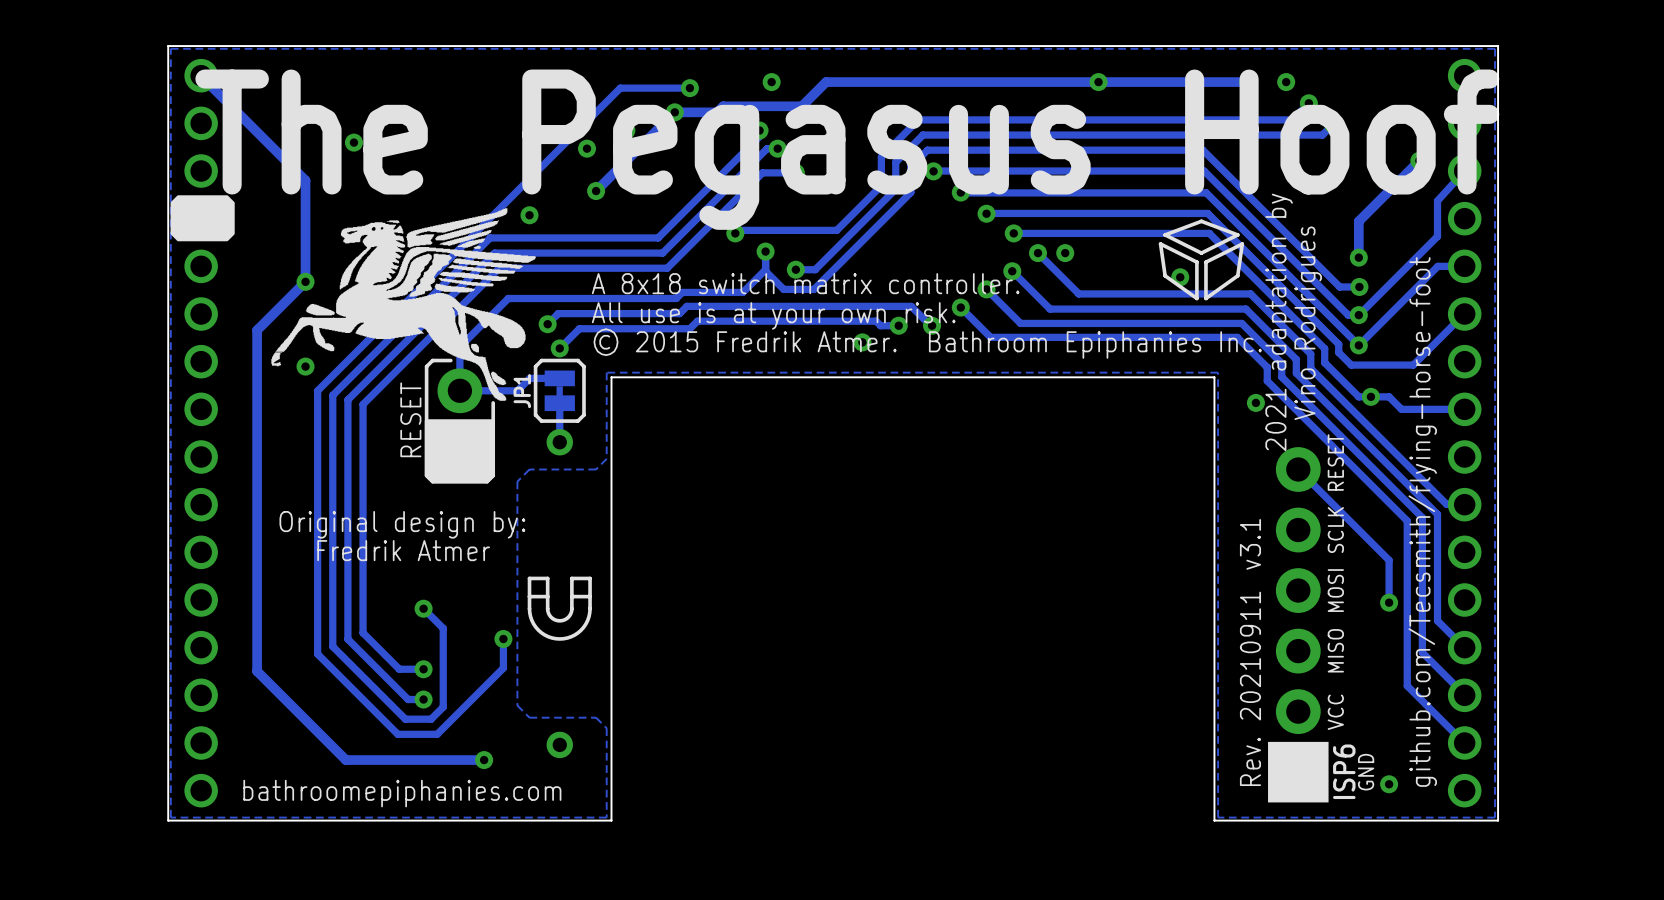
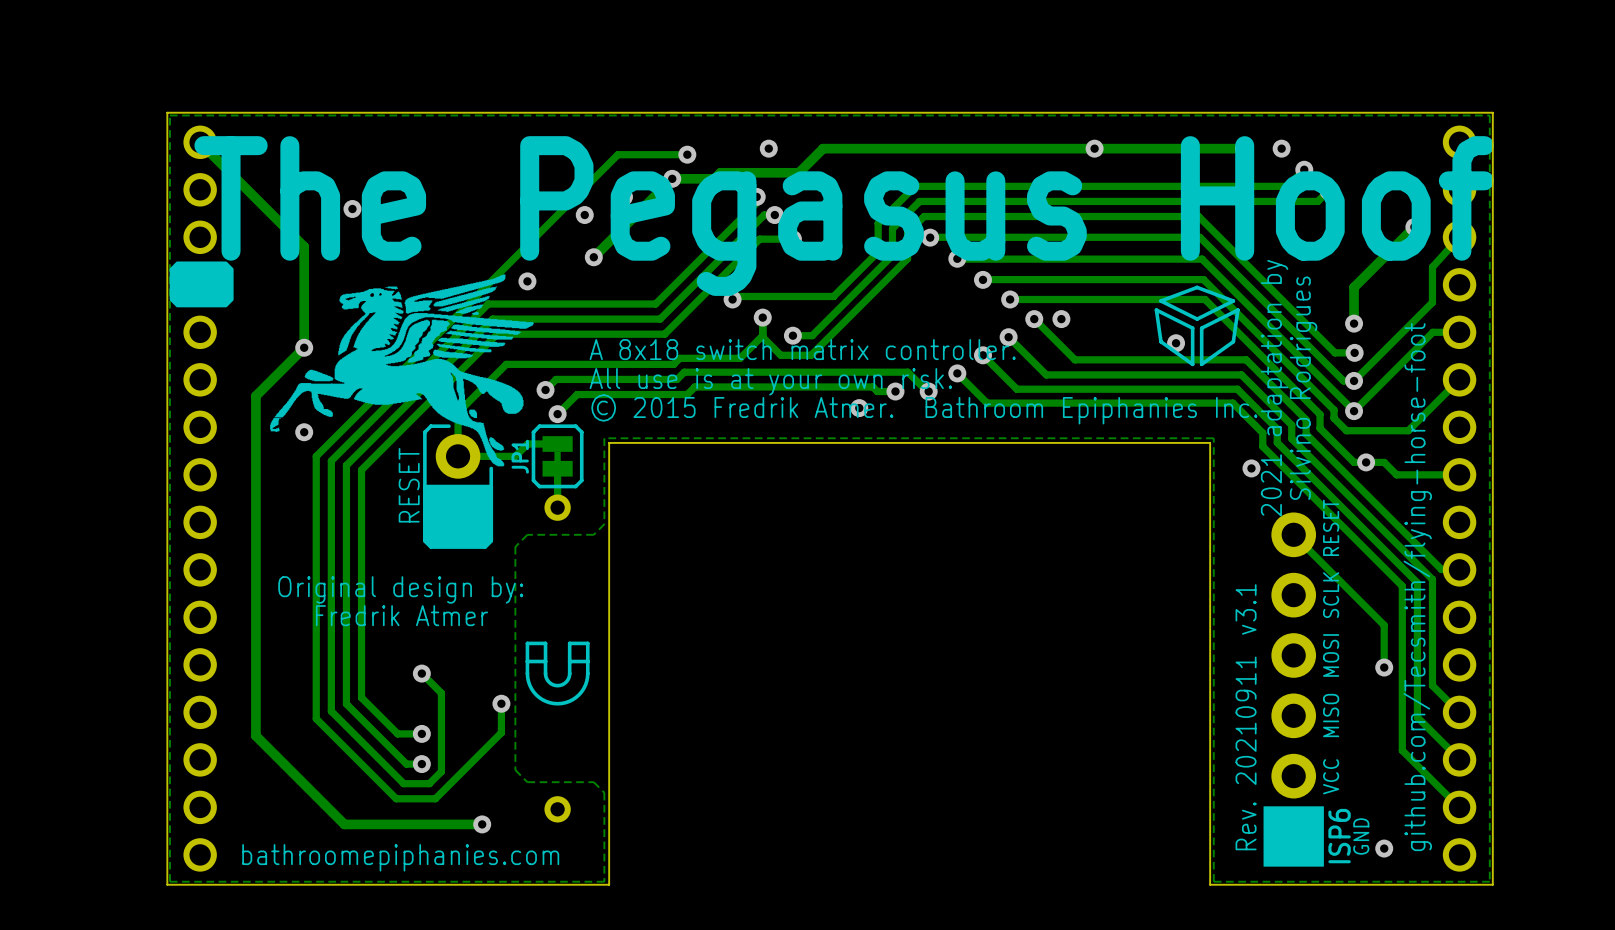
text: Vino Rodrigues (1308, 323) -> Silvino Rodrigues (1303, 388)

